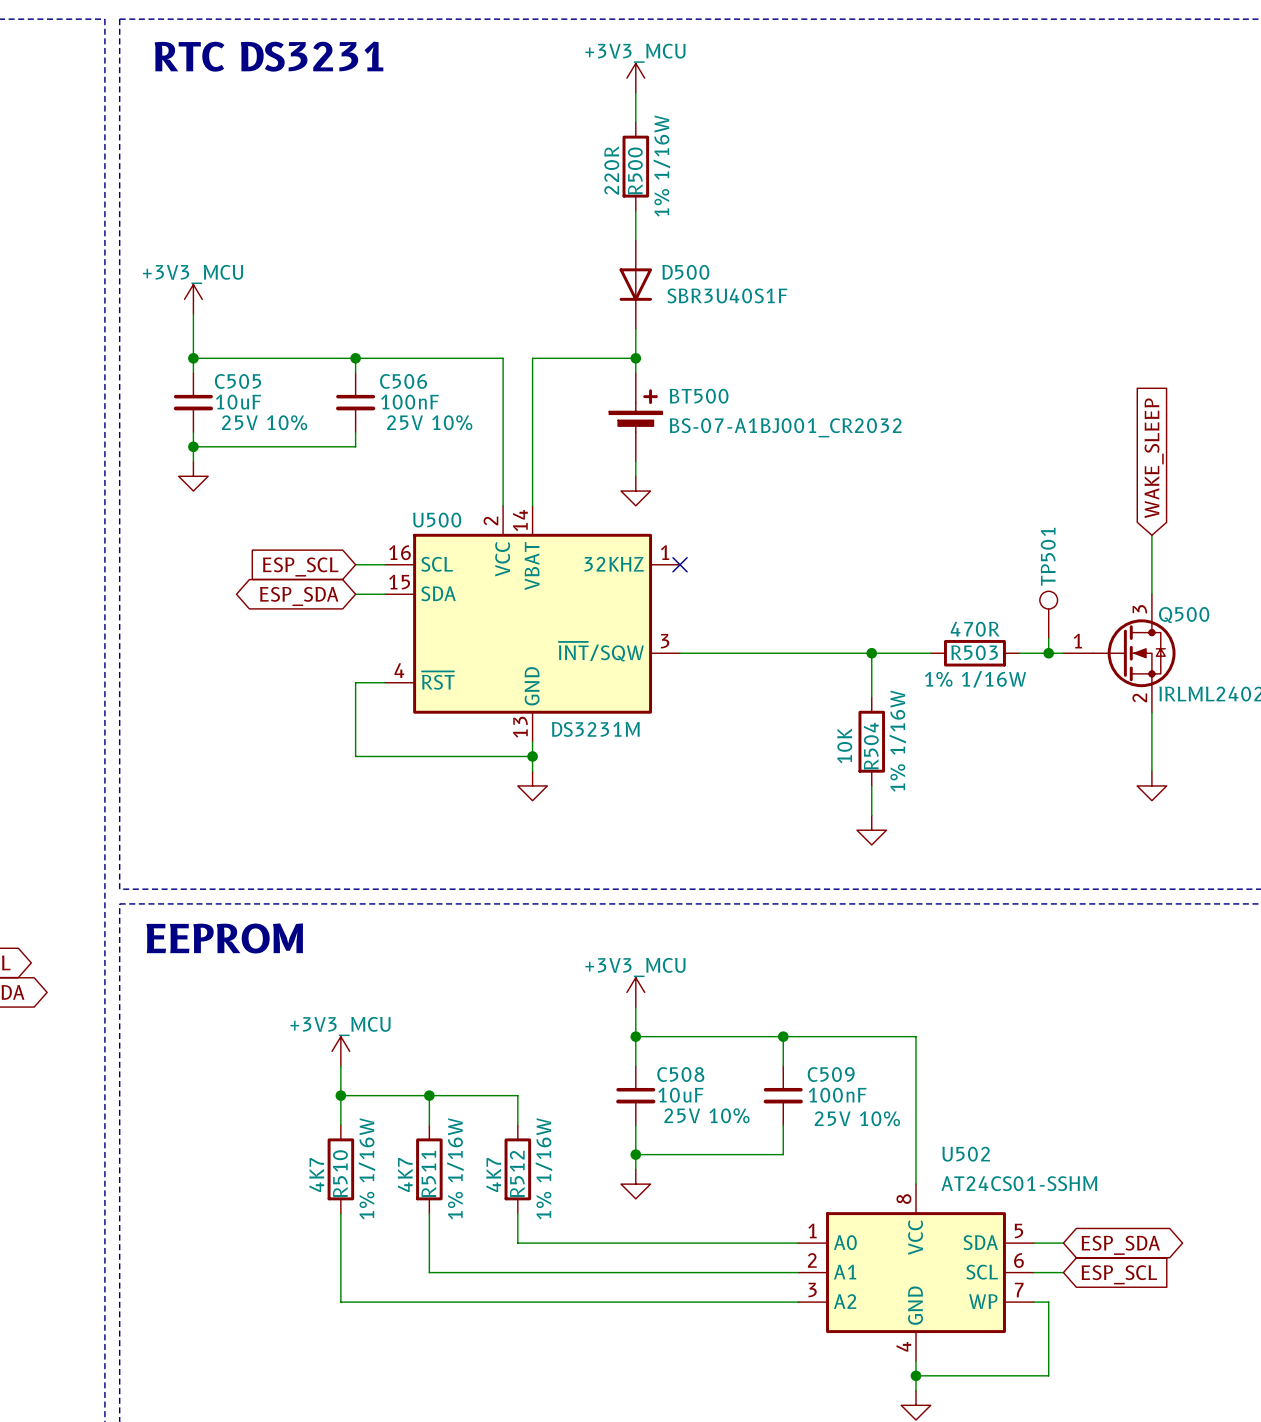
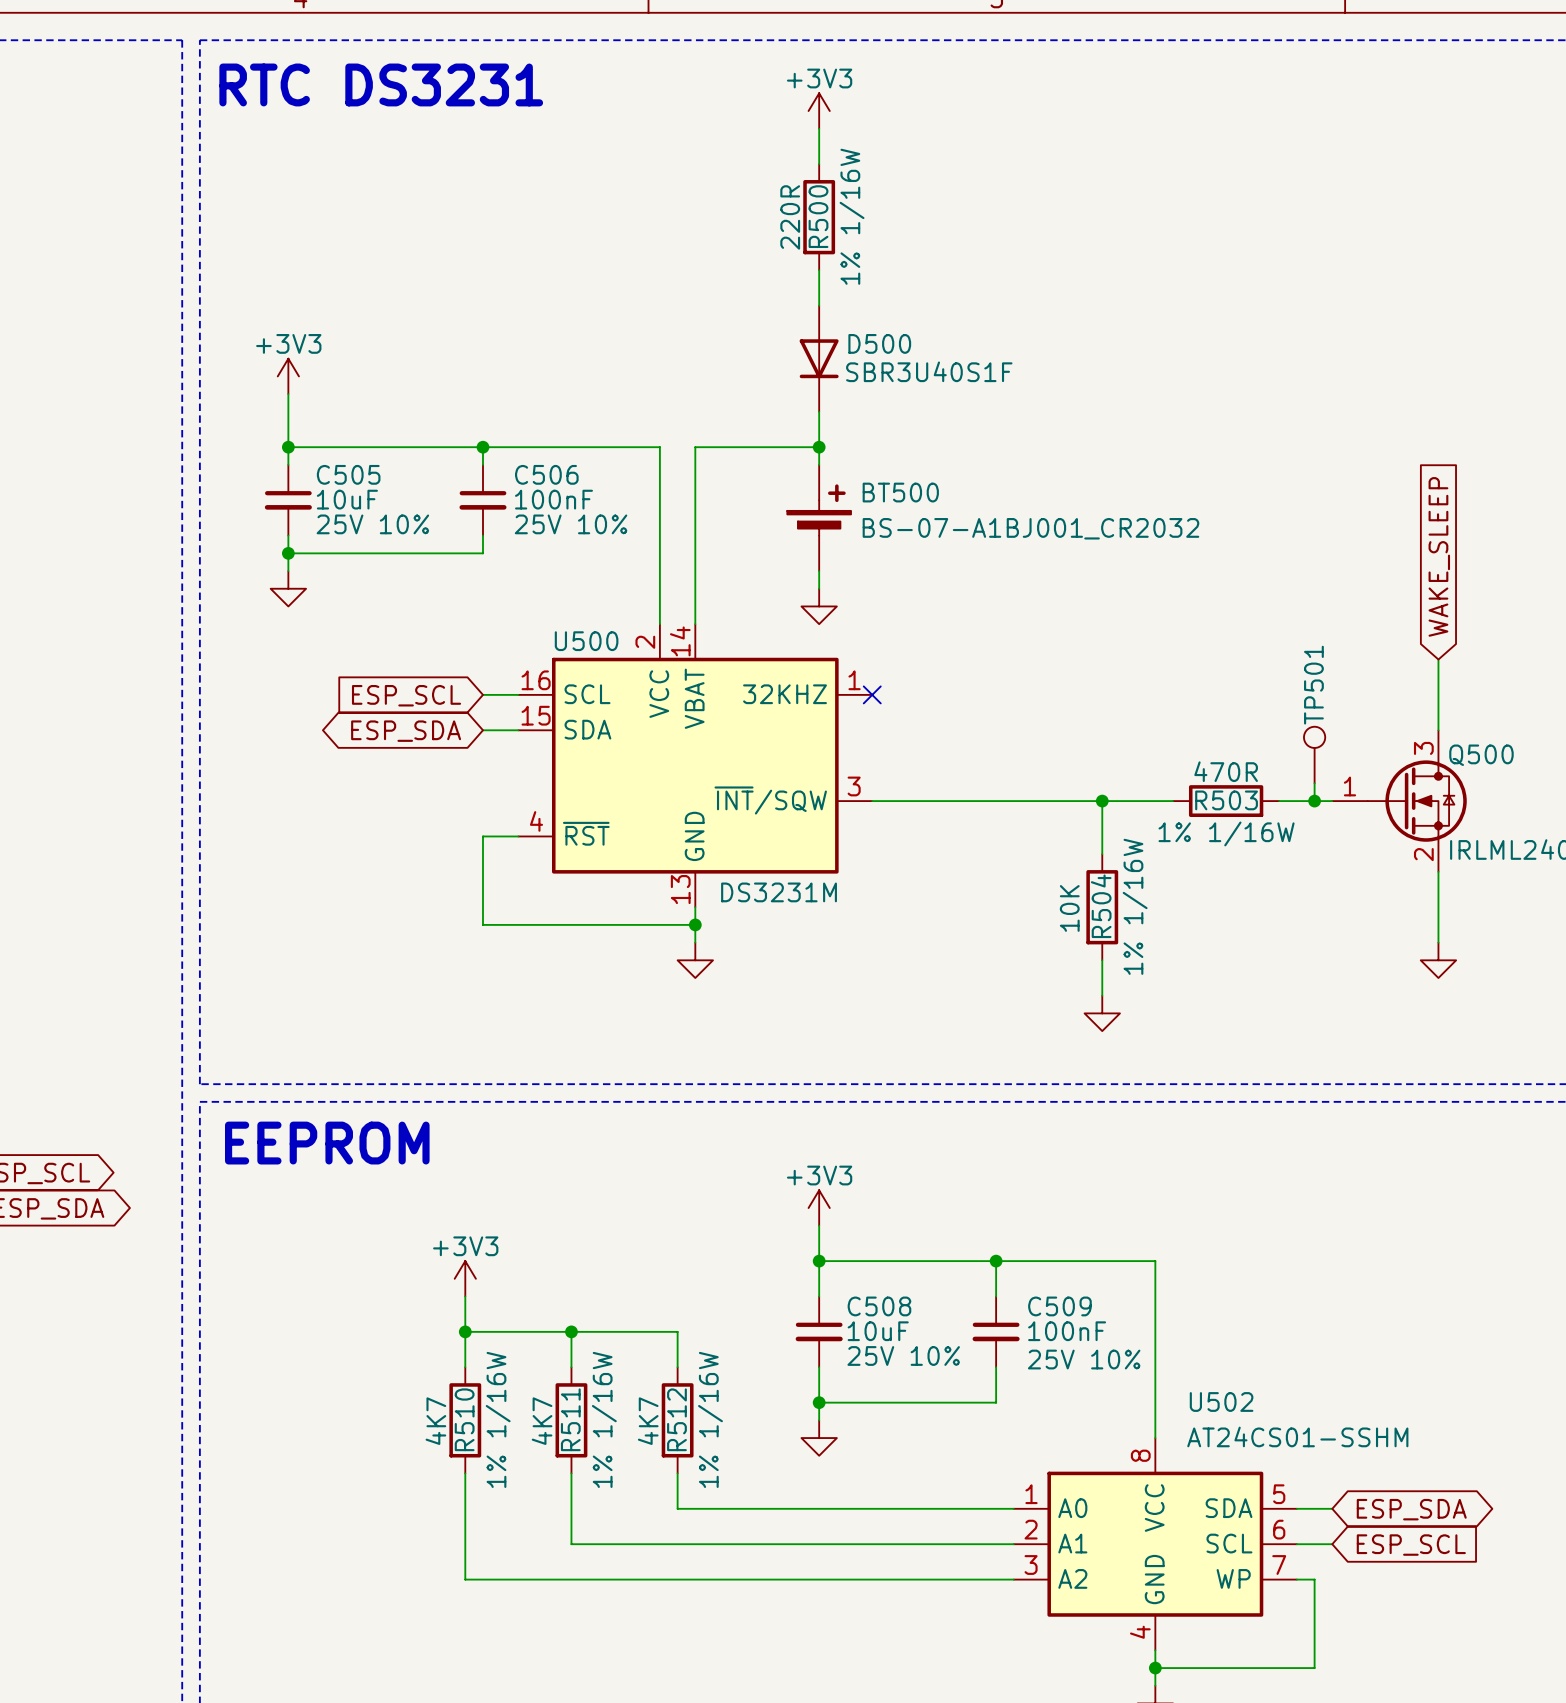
power symbol: +3V3_MCU (635, 78) -> +3V3 (819, 111)
power symbol: +3V3_MCU (193, 299) -> +3V3 (288, 376)
power symbol: +3V3_MCU (635, 992) -> +3V3 (819, 1208)
power symbol: +3V3_MCU (340, 1051) -> +3V3 (465, 1278)

